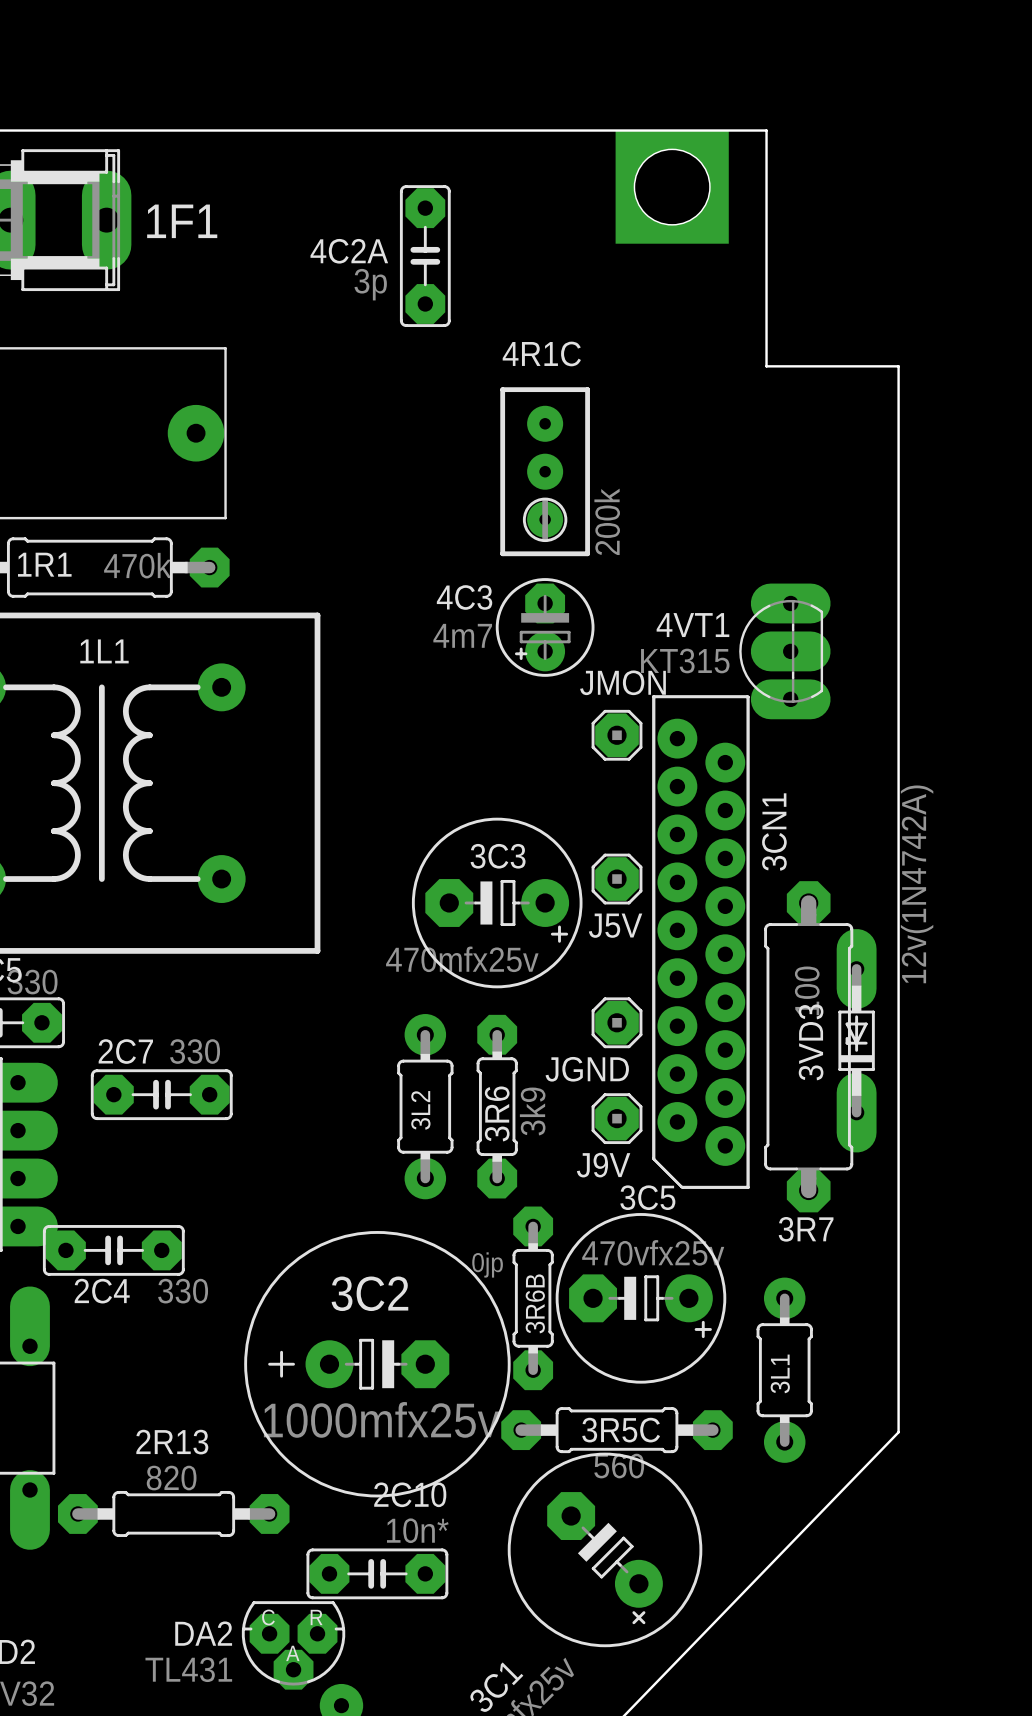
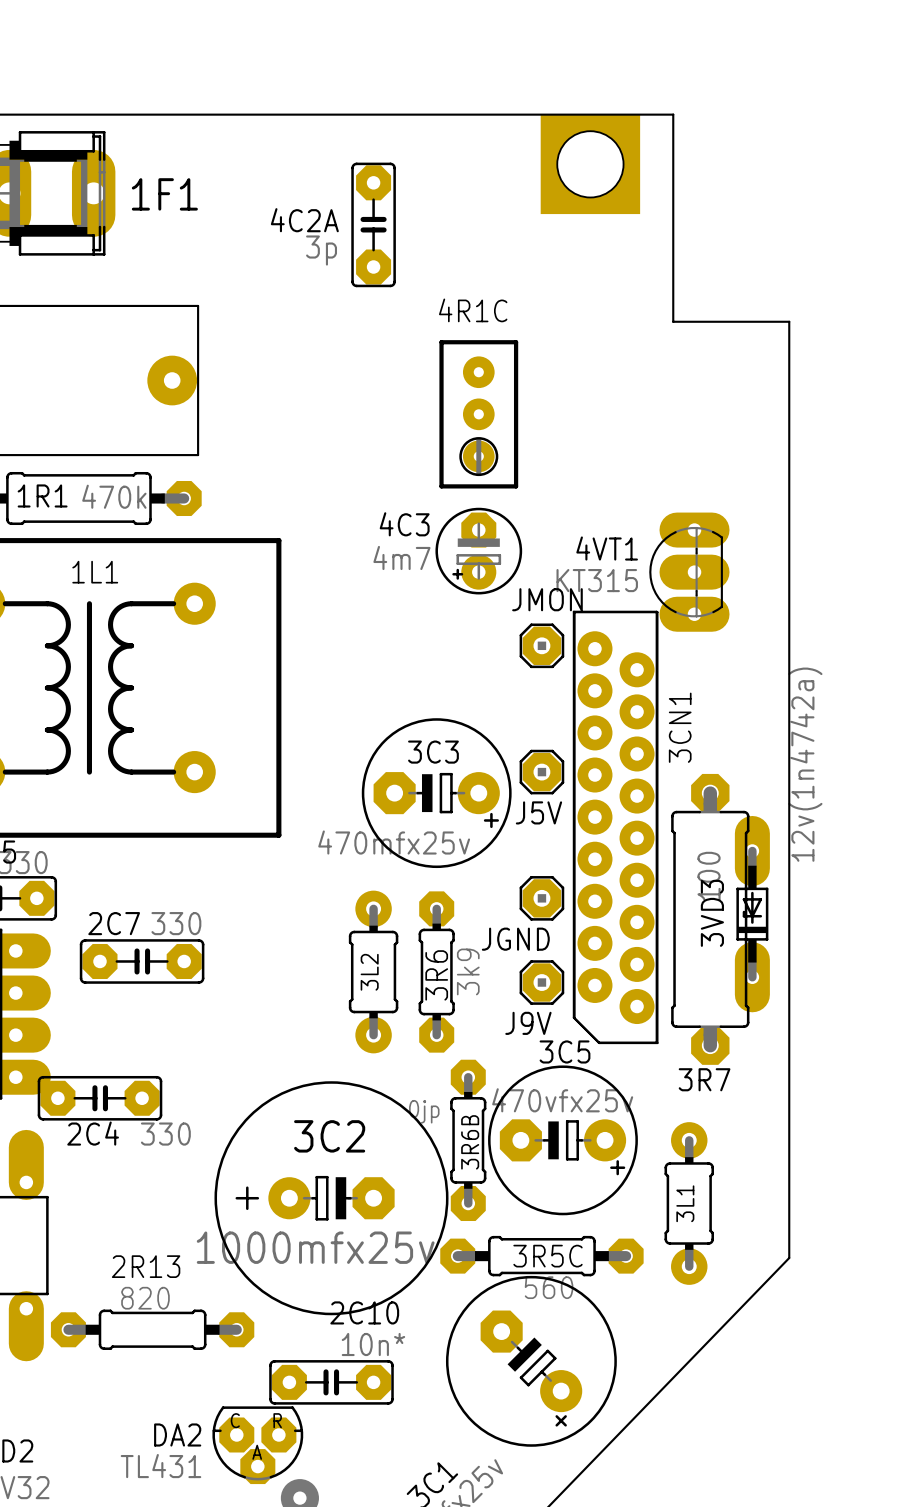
4R1C value: 200k (607, 521) -> none
3VD3 value: 12v(1N4742A) (917, 884) -> 12v(1n4742a) (805, 764)

